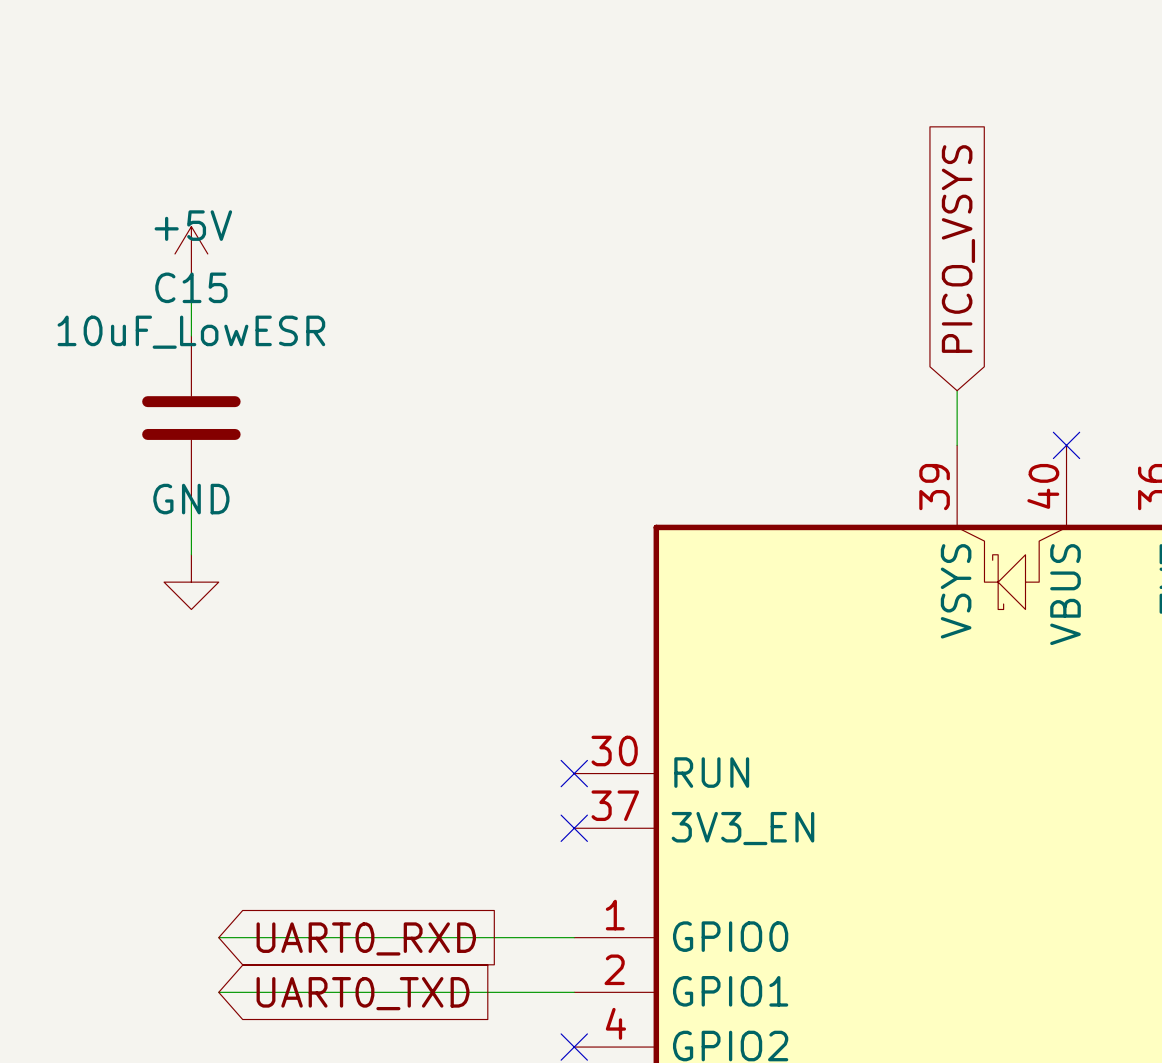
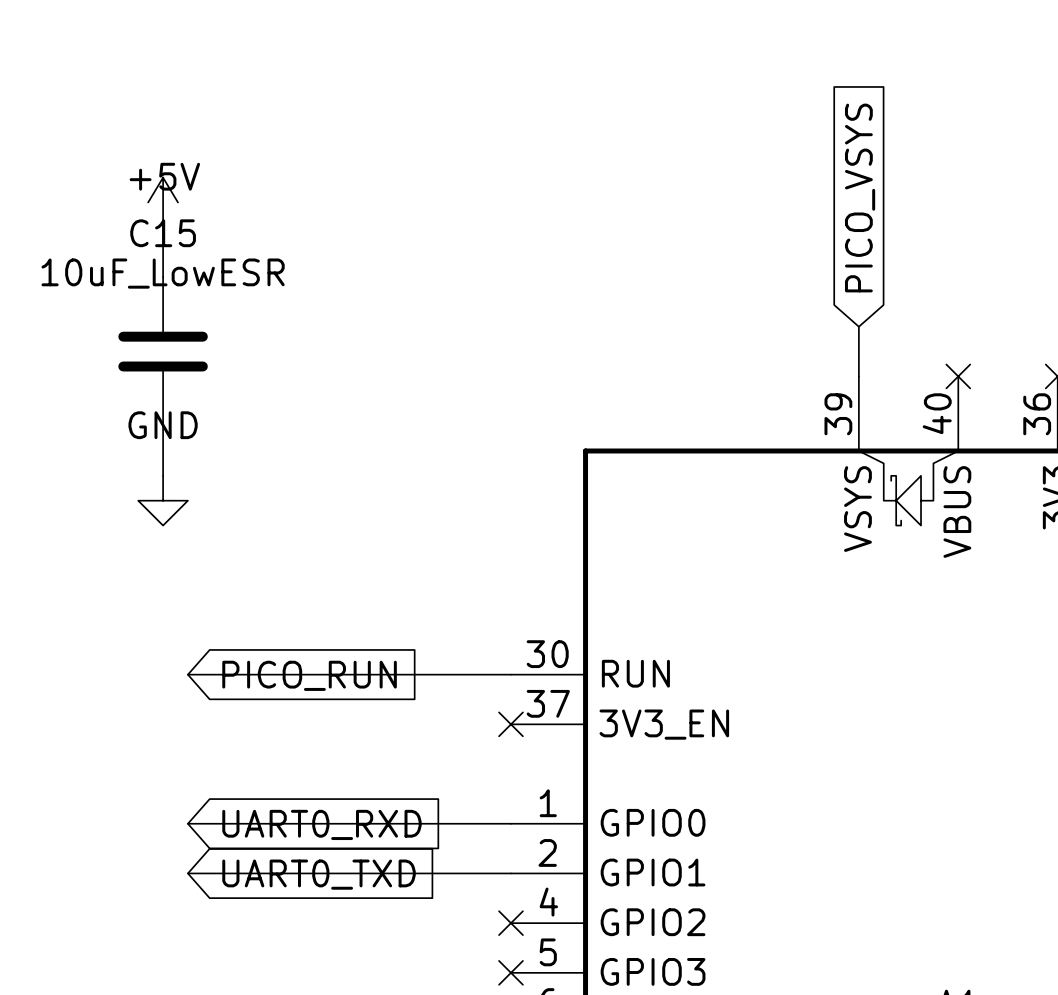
wire: none -> (187, 674) (510, 674)
no-connect mark: (574, 773) -> none
global label: none -> PICO_RUN (309, 675)

